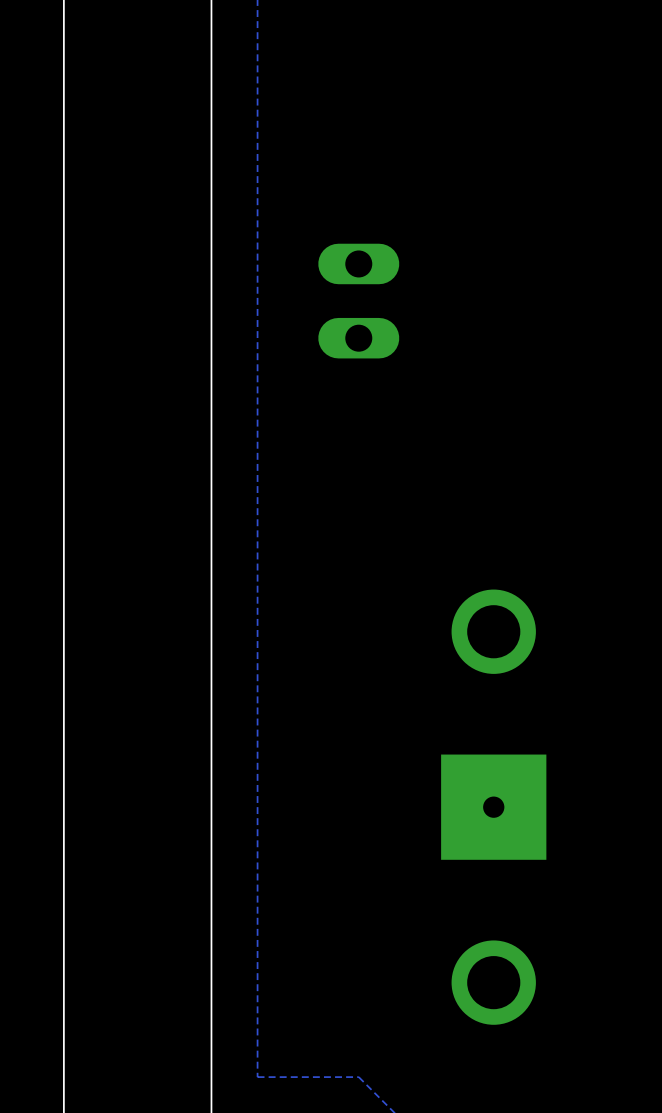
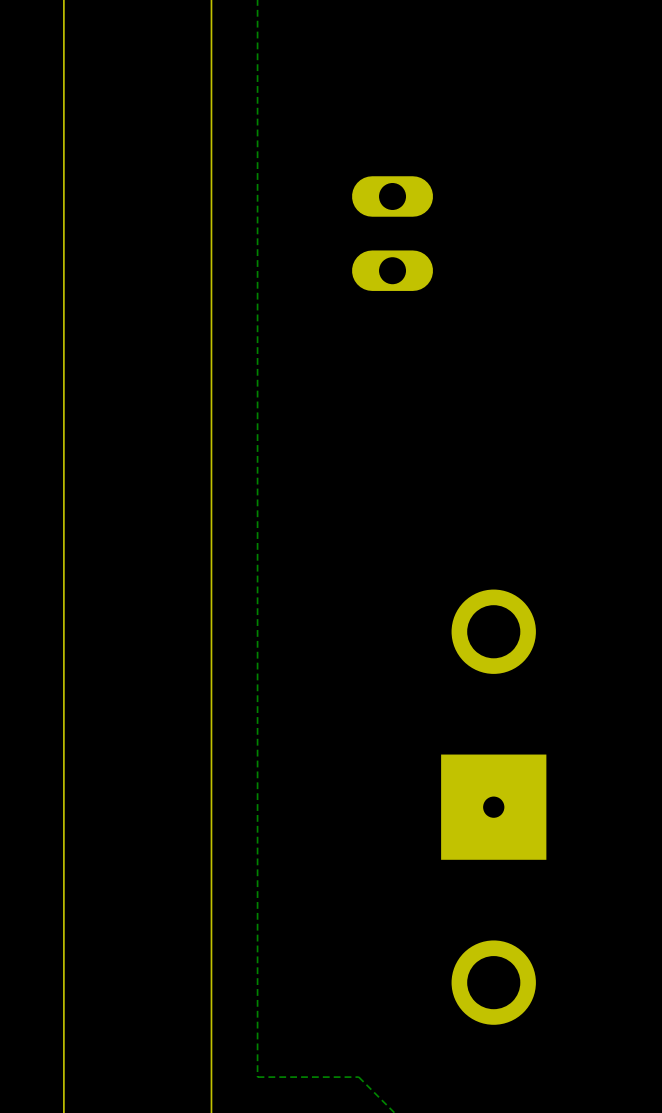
part position: (358, 301) -> (392, 233)

